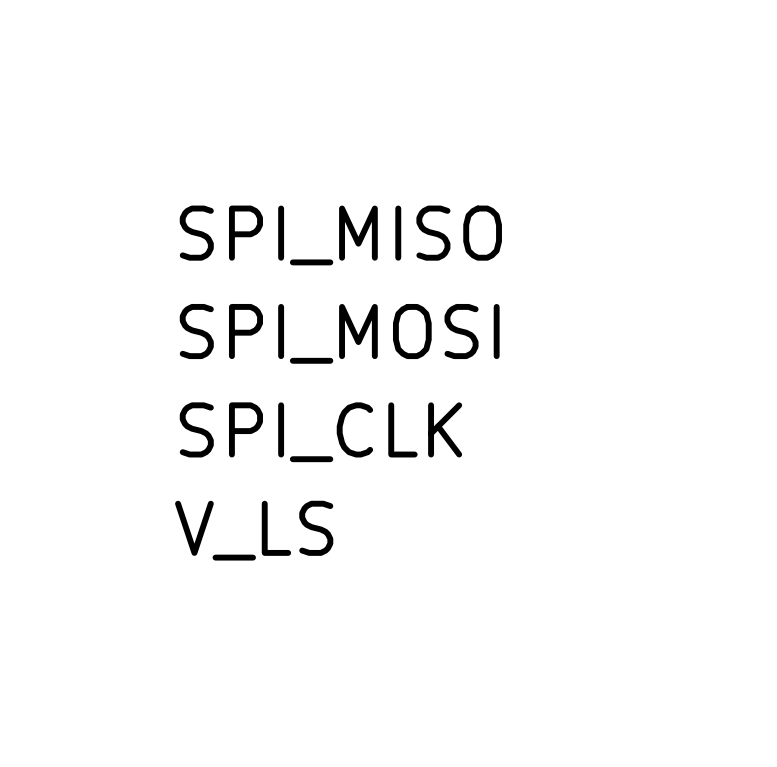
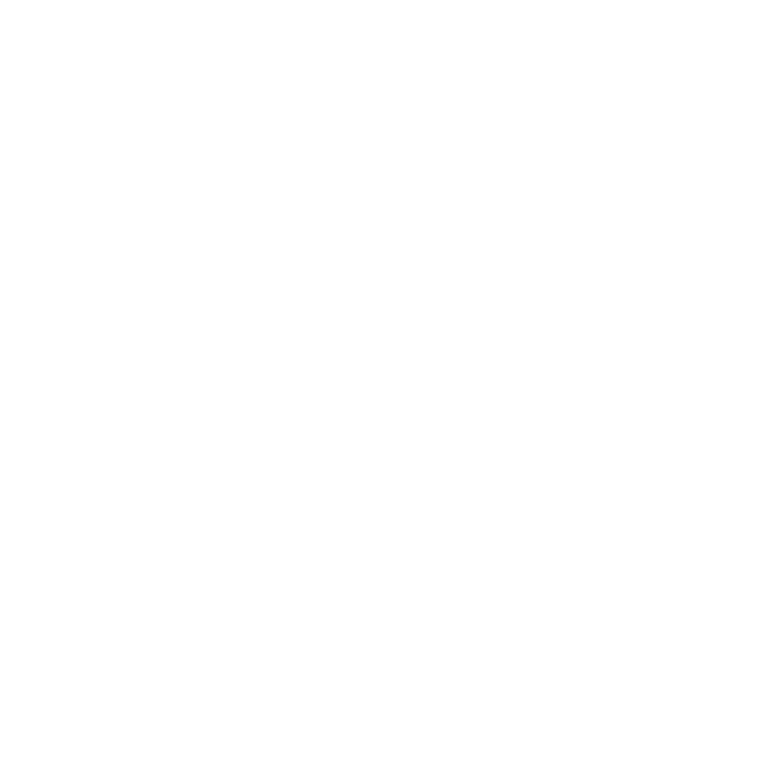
label: SPI_MISO (340, 235) -> none
label: SPI_MOSI (339, 333) -> none
label: SPI_CLK (320, 432) -> none
label: V_LS (254, 530) -> none

